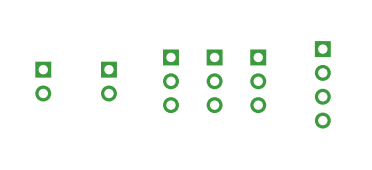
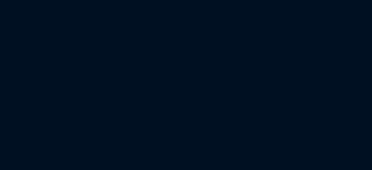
part: (43, 81) -> none
part: (108, 81) -> none
part: (170, 81) -> none
part: (214, 81) -> none
part: (258, 81) -> none
part: (322, 84) -> none

